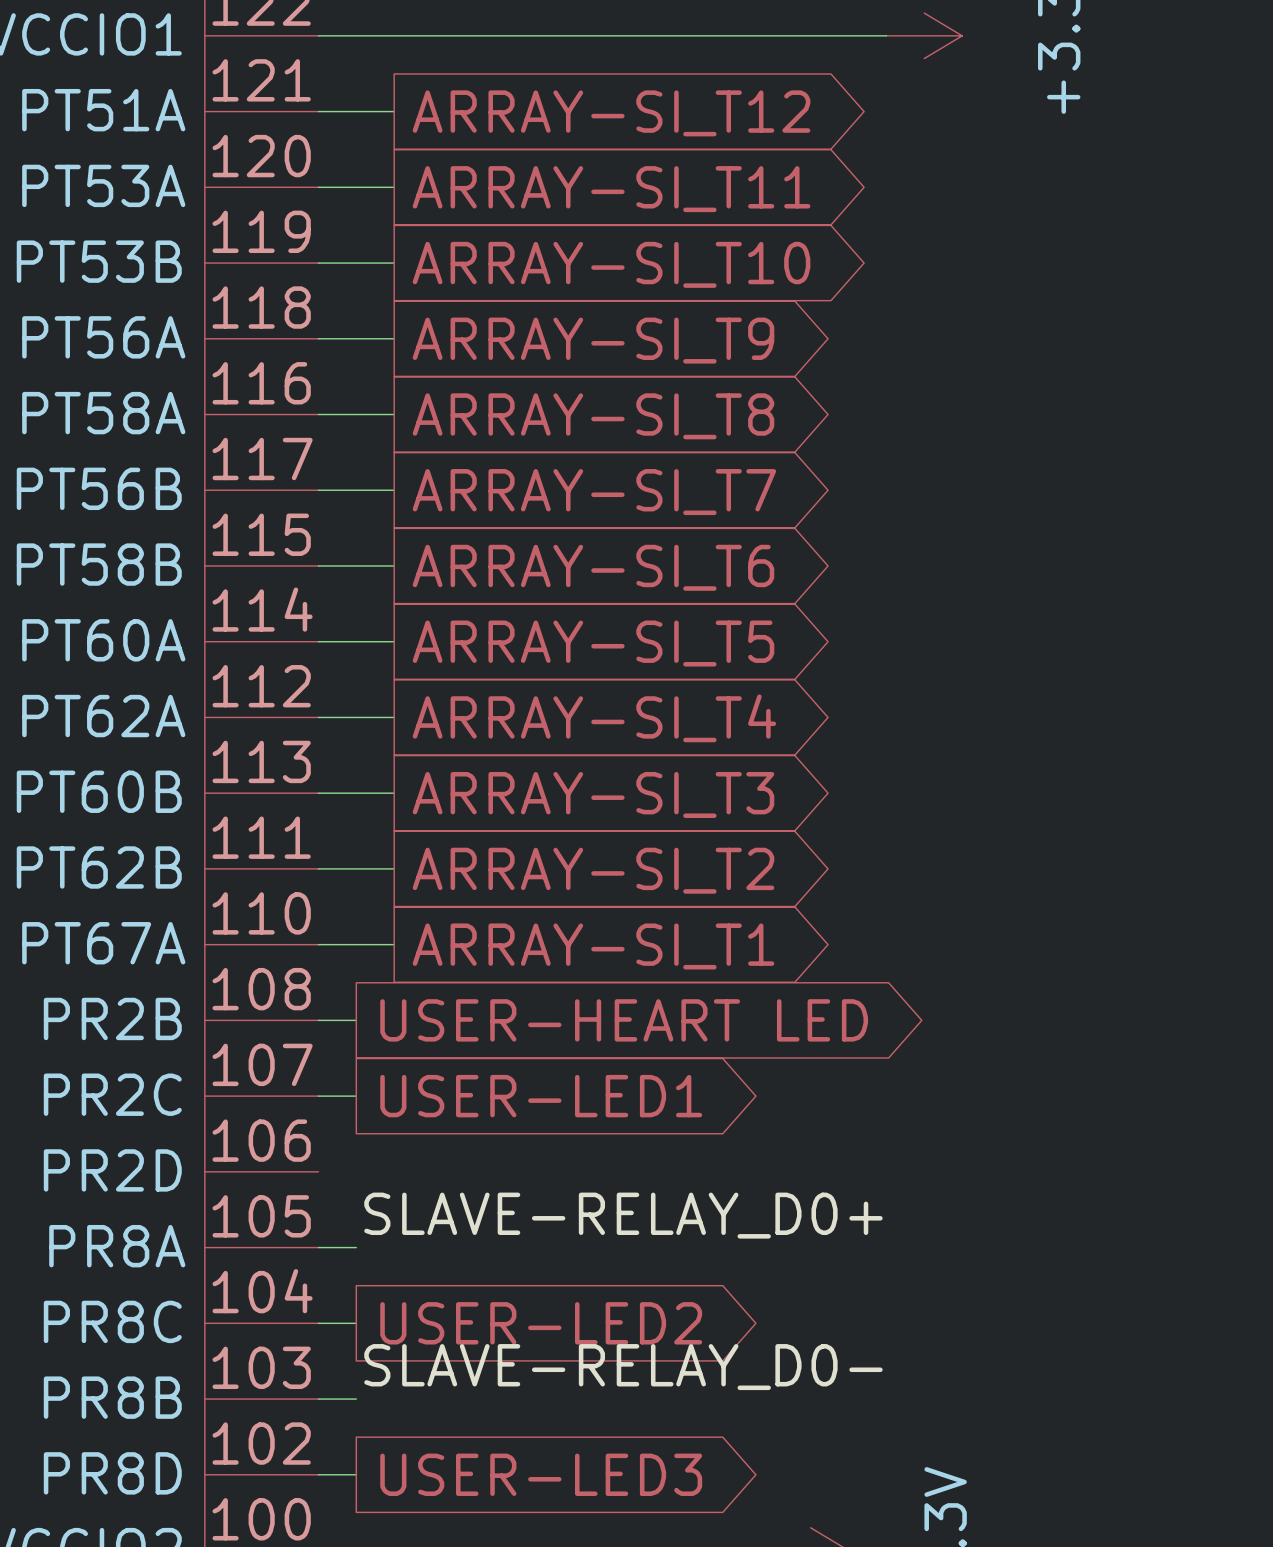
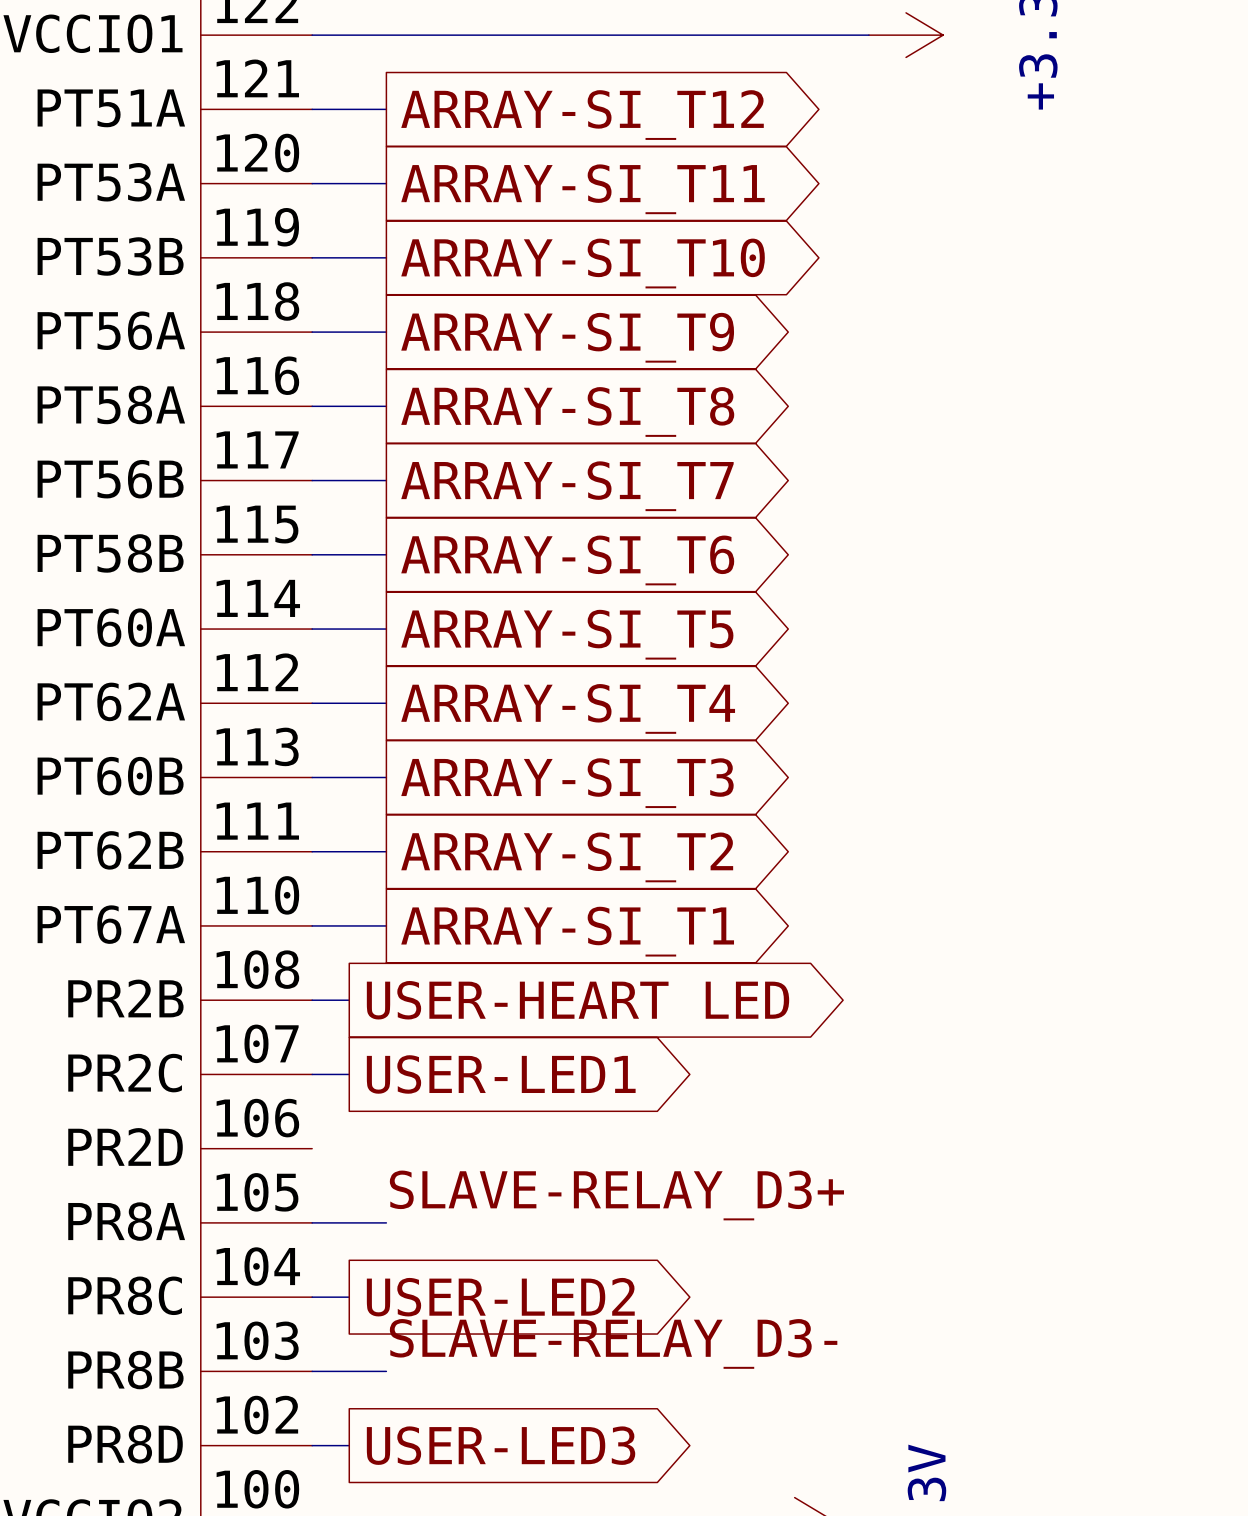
label: SLAVE-RELAY_D0+ (623, 1215) -> SLAVE-RELAY_D3+ (616, 1195)
wire: none -> (349, 1222) (386, 1222)
label: SLAVE-RELAY_D0- (623, 1367) -> SLAVE-RELAY_D3- (613, 1343)
wire: none -> (349, 1371) (386, 1371)

